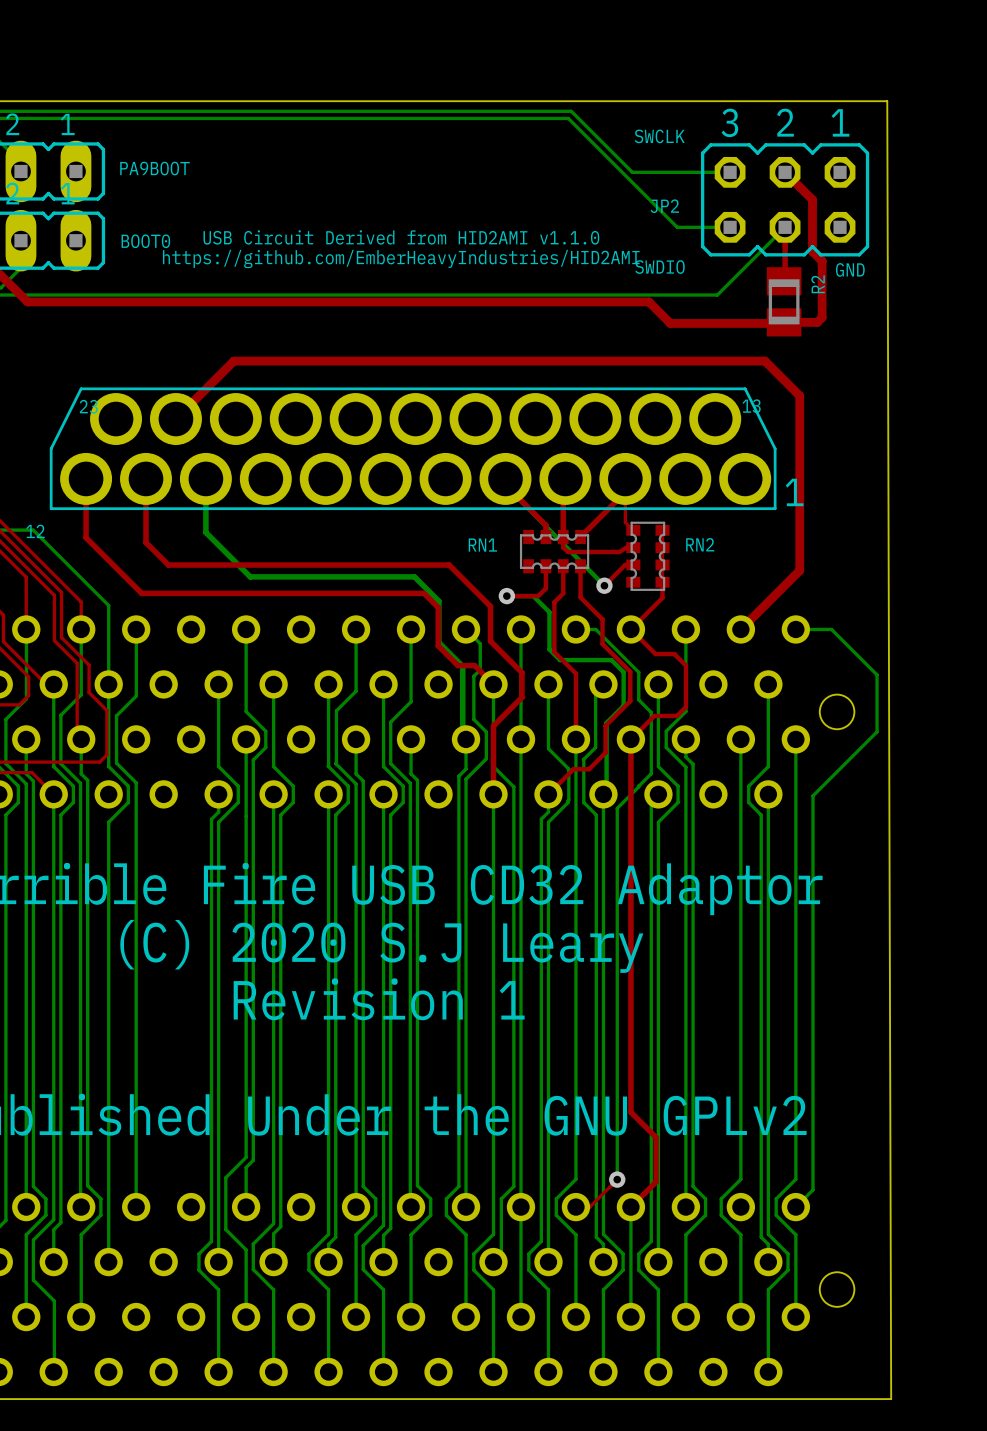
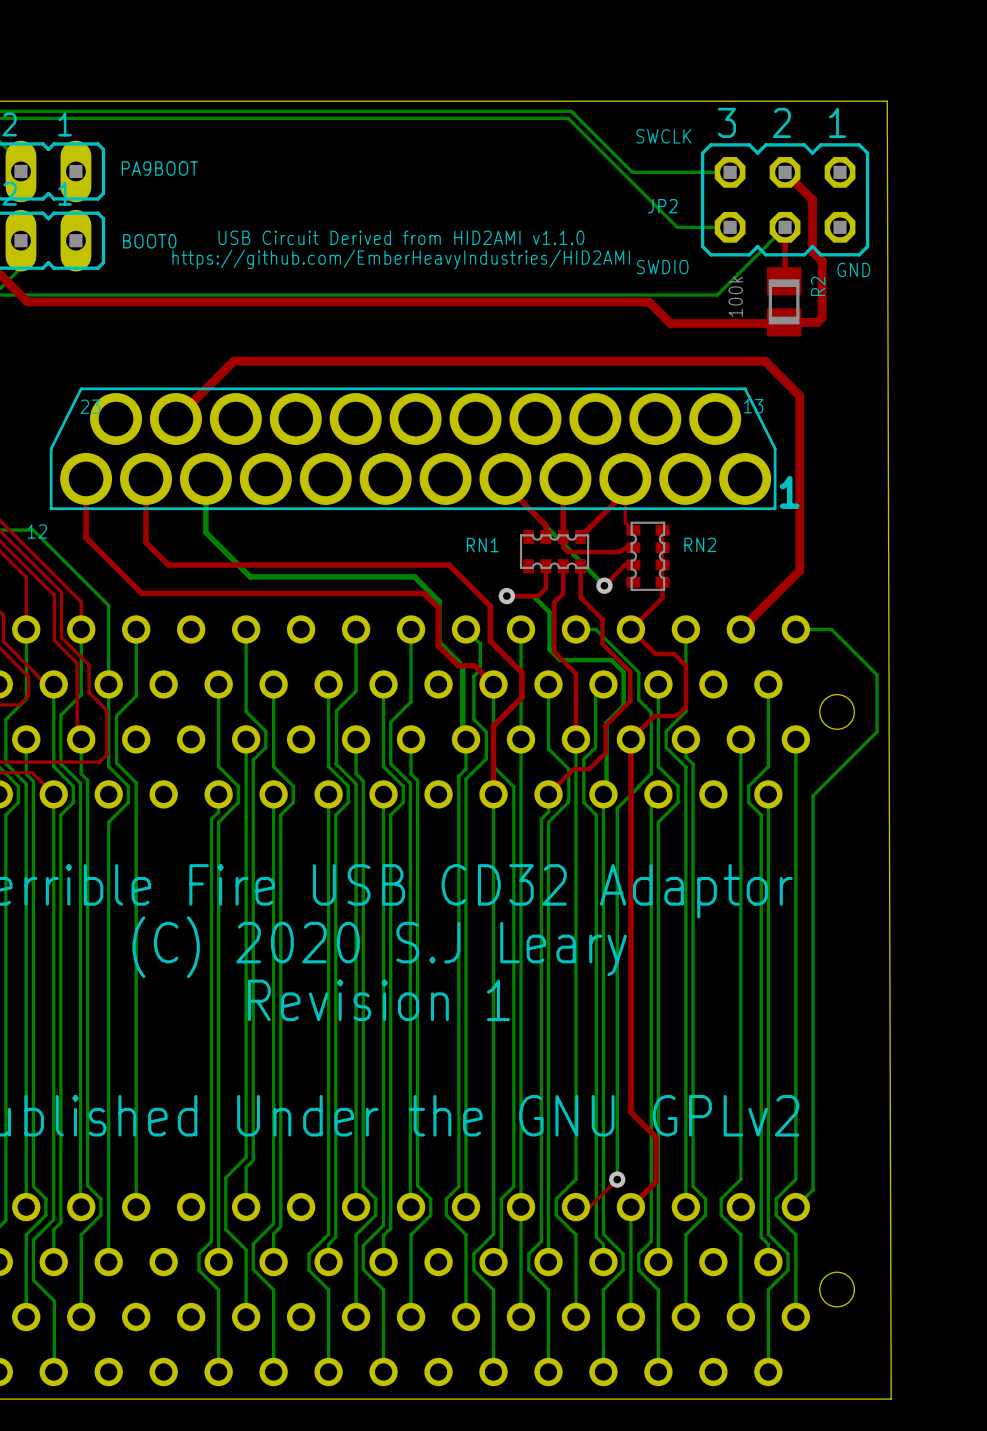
R2 value: none -> 100k (735, 296)

